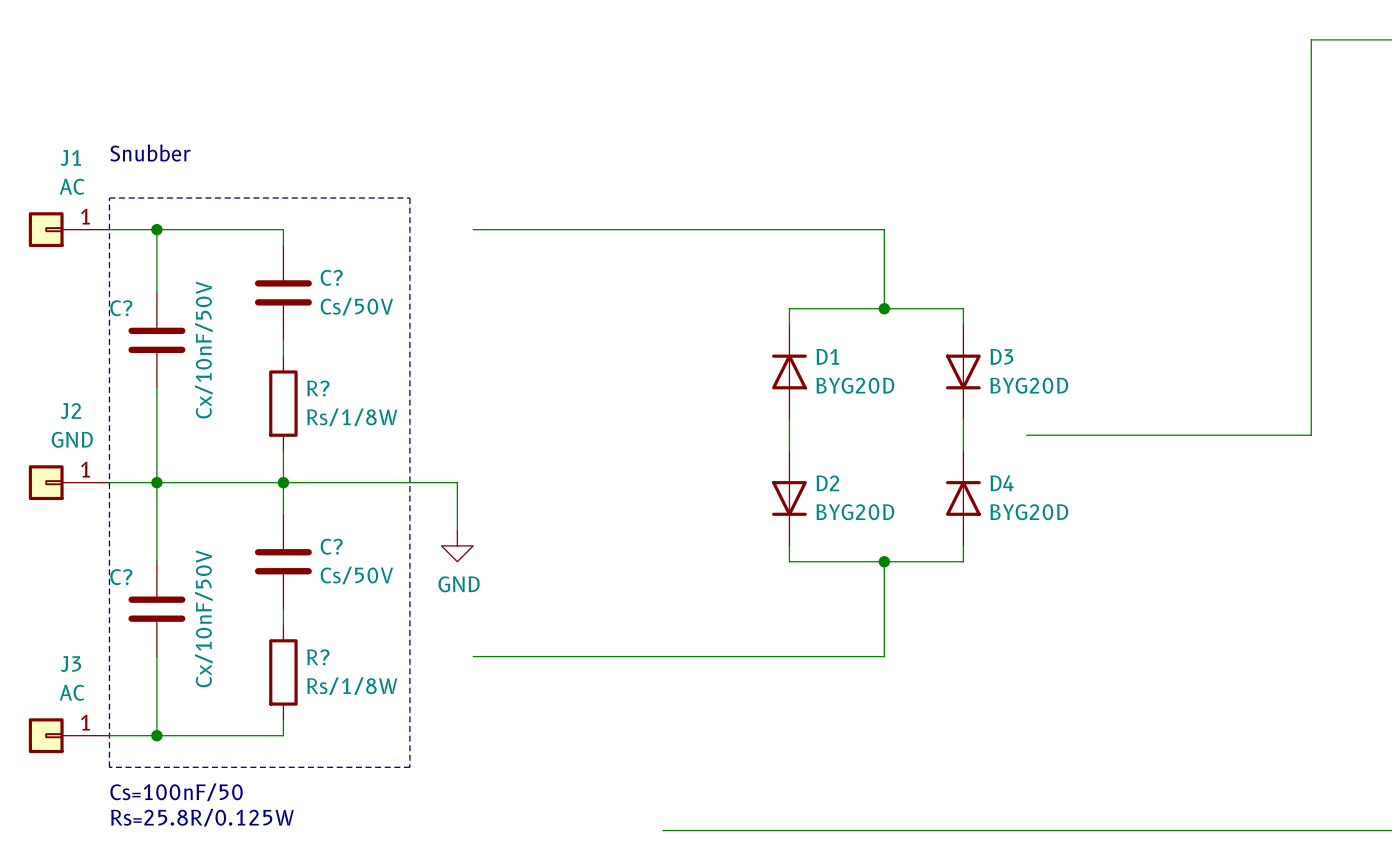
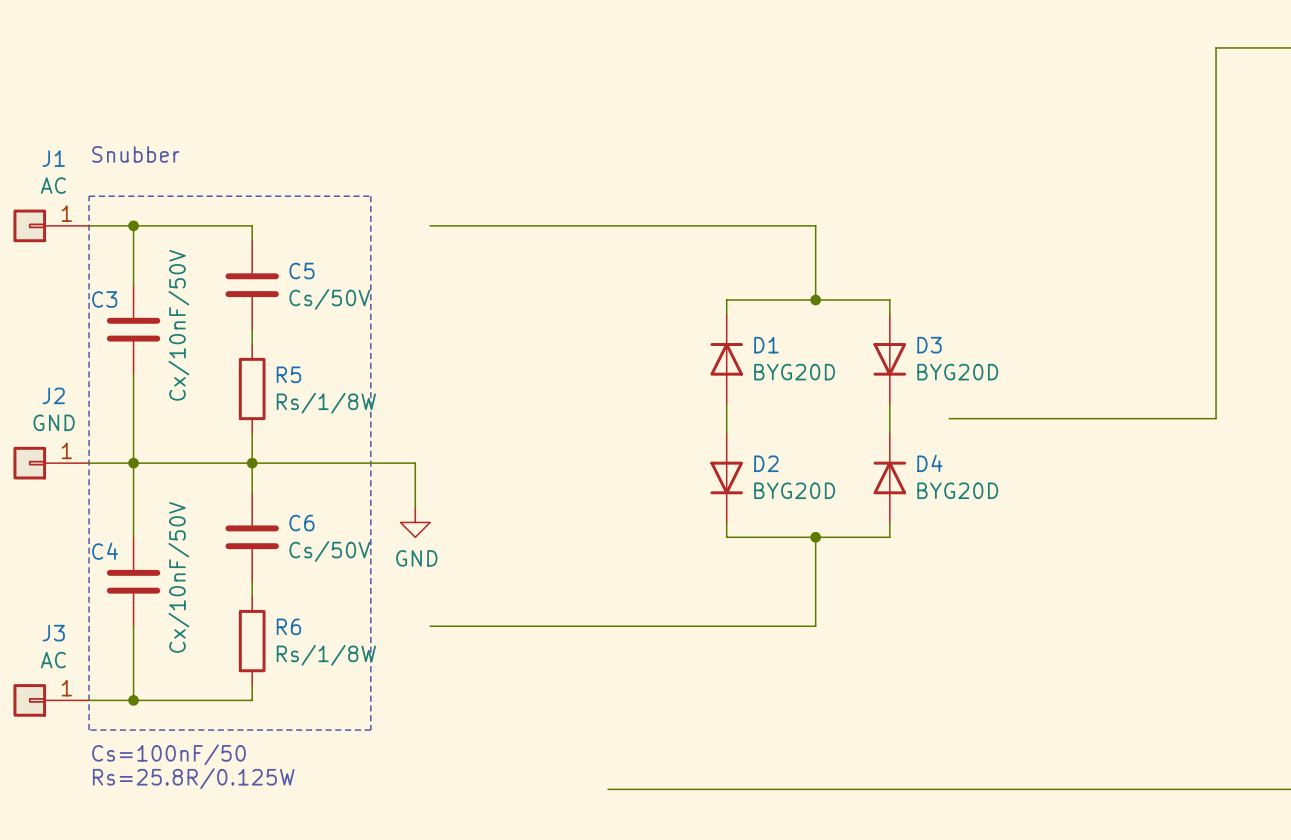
C? name: C? (331, 277) -> C5 (301, 271)
C? name: C? (121, 308) -> C3 (104, 299)
R? name: R? (318, 388) -> R5 (288, 374)
C? name: C? (331, 546) -> C6 (301, 523)
C? name: C? (121, 577) -> C4 (105, 551)
R? name: R? (318, 657) -> R6 (288, 626)

